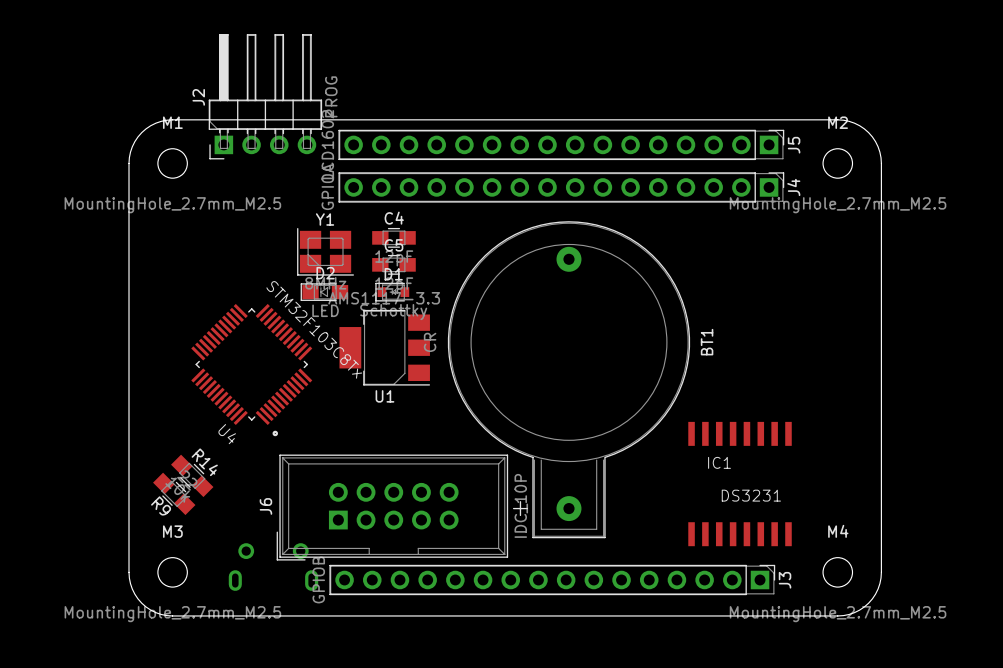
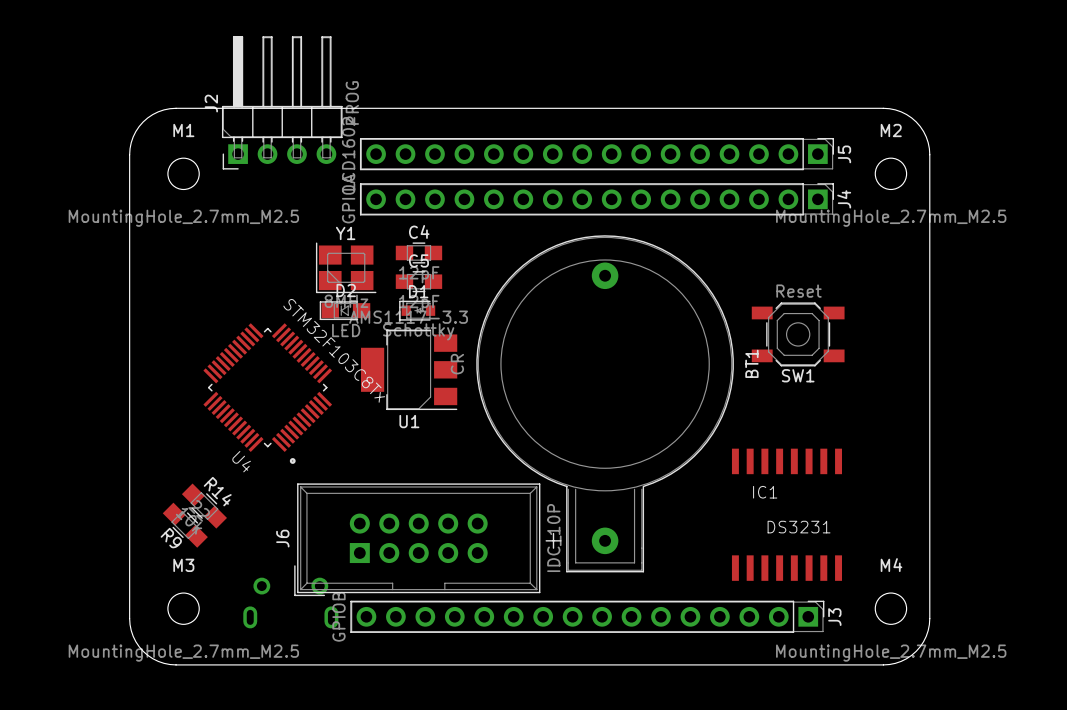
board edge: (172, 119) (837, 119) (849, 121) (864, 128) (875, 141) (881, 163) (881, 572) (878, 589) (872, 598) (859, 610) (837, 615) (172, 615) (155, 612) (146, 606) (132, 589) (129, 572) (129, 163) (132, 146) (141, 132) (155, 123) (172, 119) -> (176, 108) (158, 111) (143, 121) (133, 136) (129, 154) (129, 618) (131, 630) (135, 641) (147, 655) (164, 663) (176, 664) (883, 664) (895, 663) (906, 658) (920, 646) (928, 630) (929, 618) (929, 154) (928, 142) (923, 131) (911, 117) (895, 109) (883, 108) (176, 108)
SW1: none -> Reset (798, 334)

